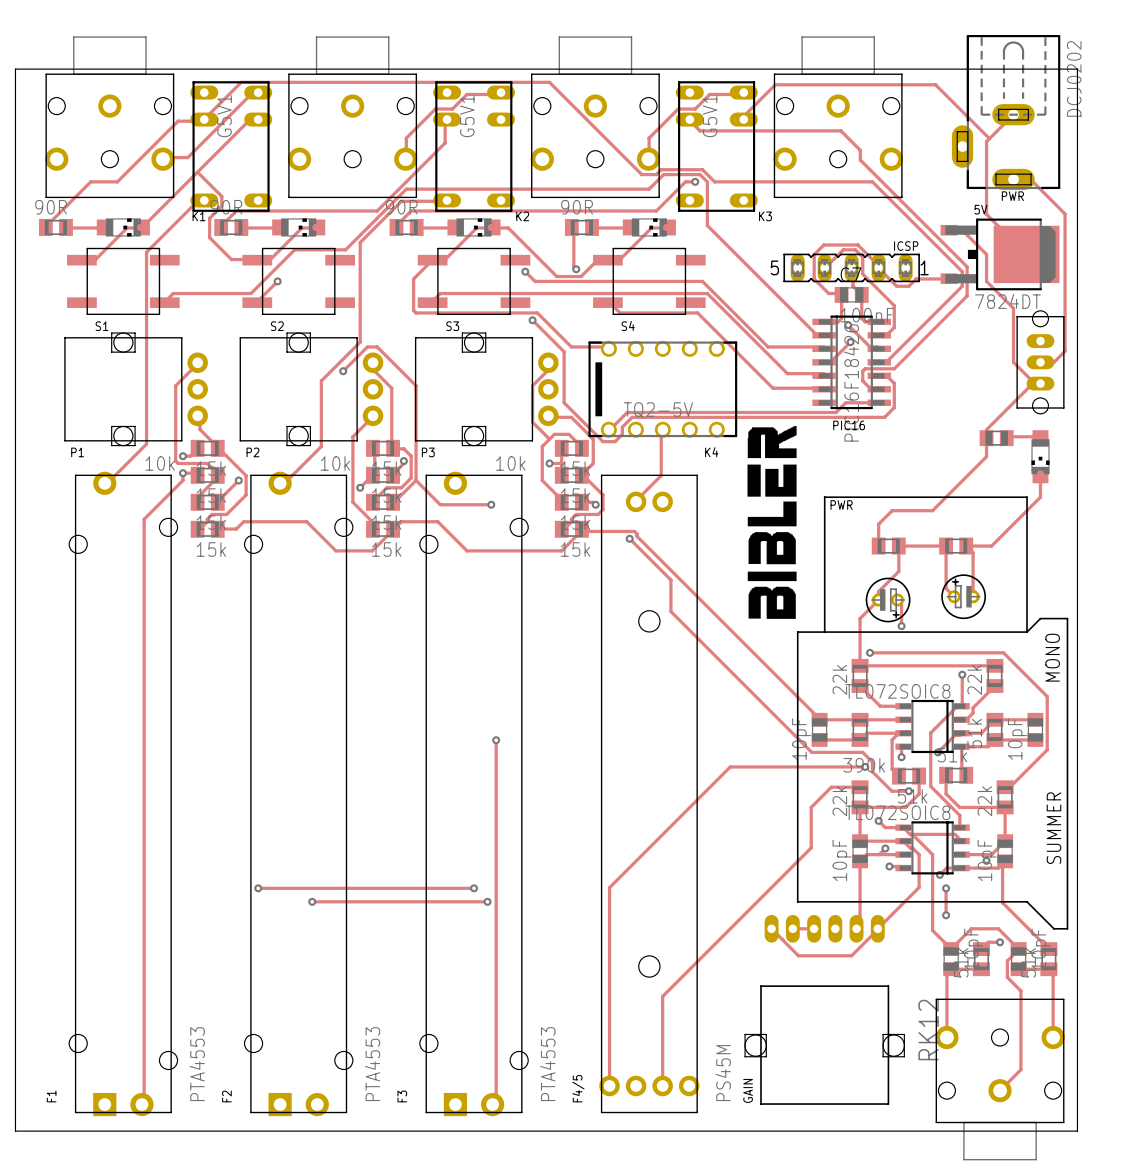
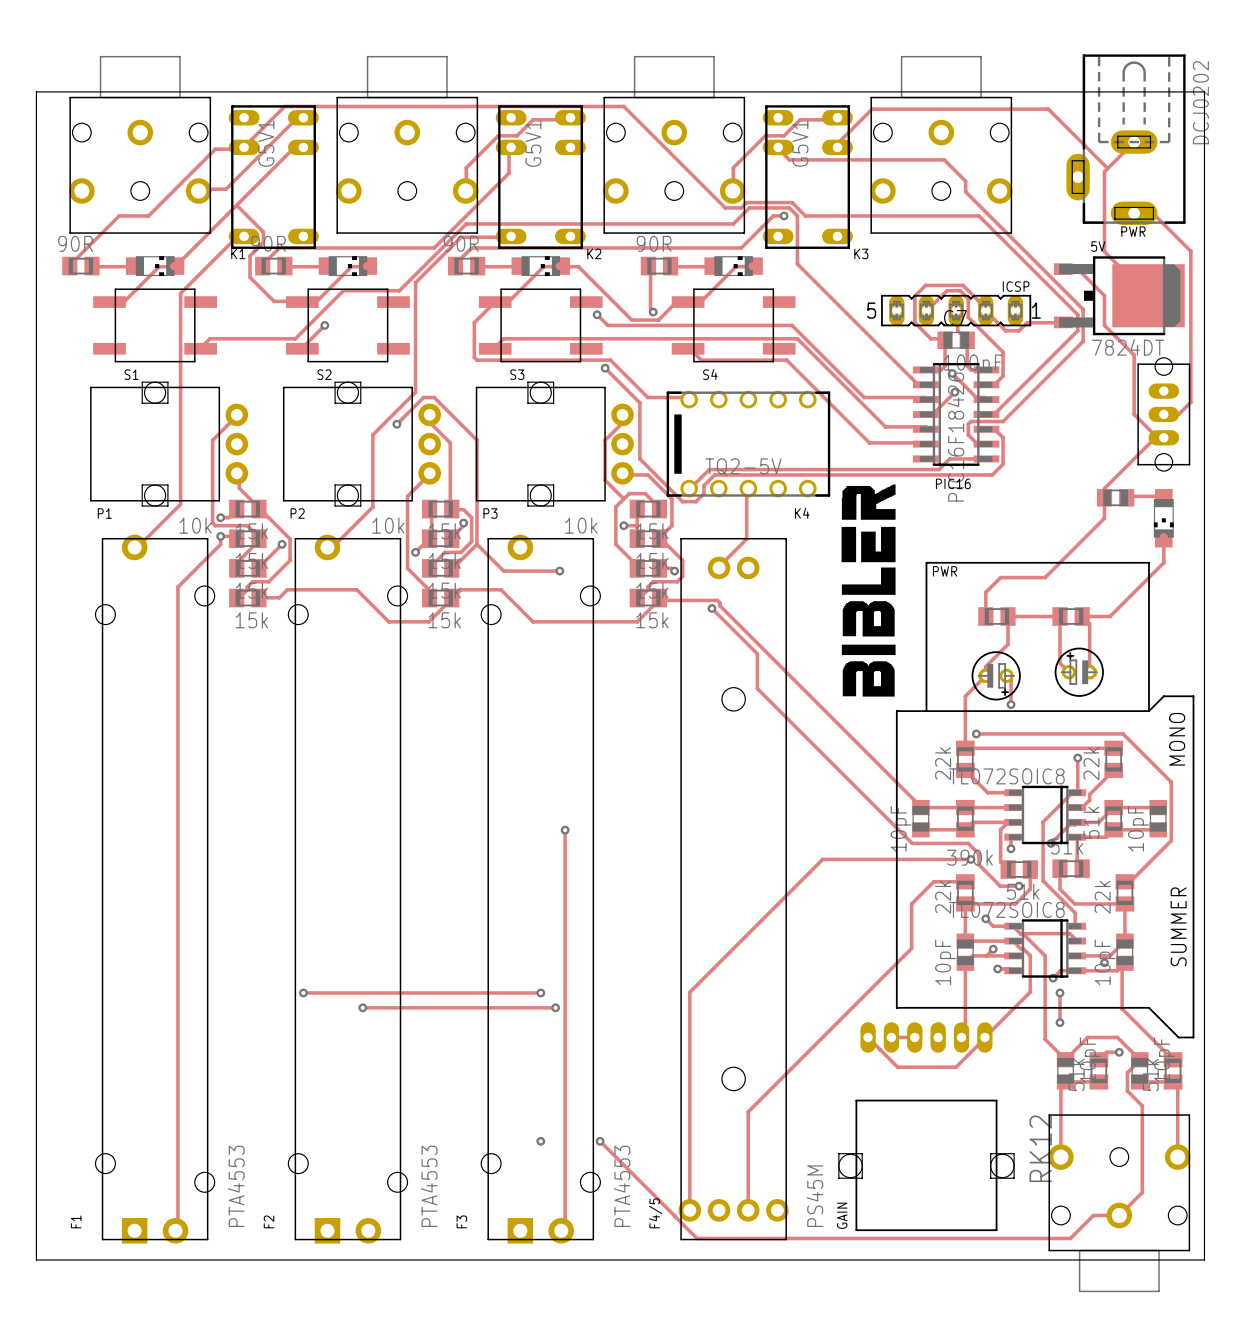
via: none -> (540, 1141)
track: none -> (600, 1141) (696, 1238) (1070, 1238) (1093, 1215) (1119, 1215)
via: none -> (600, 1141)

